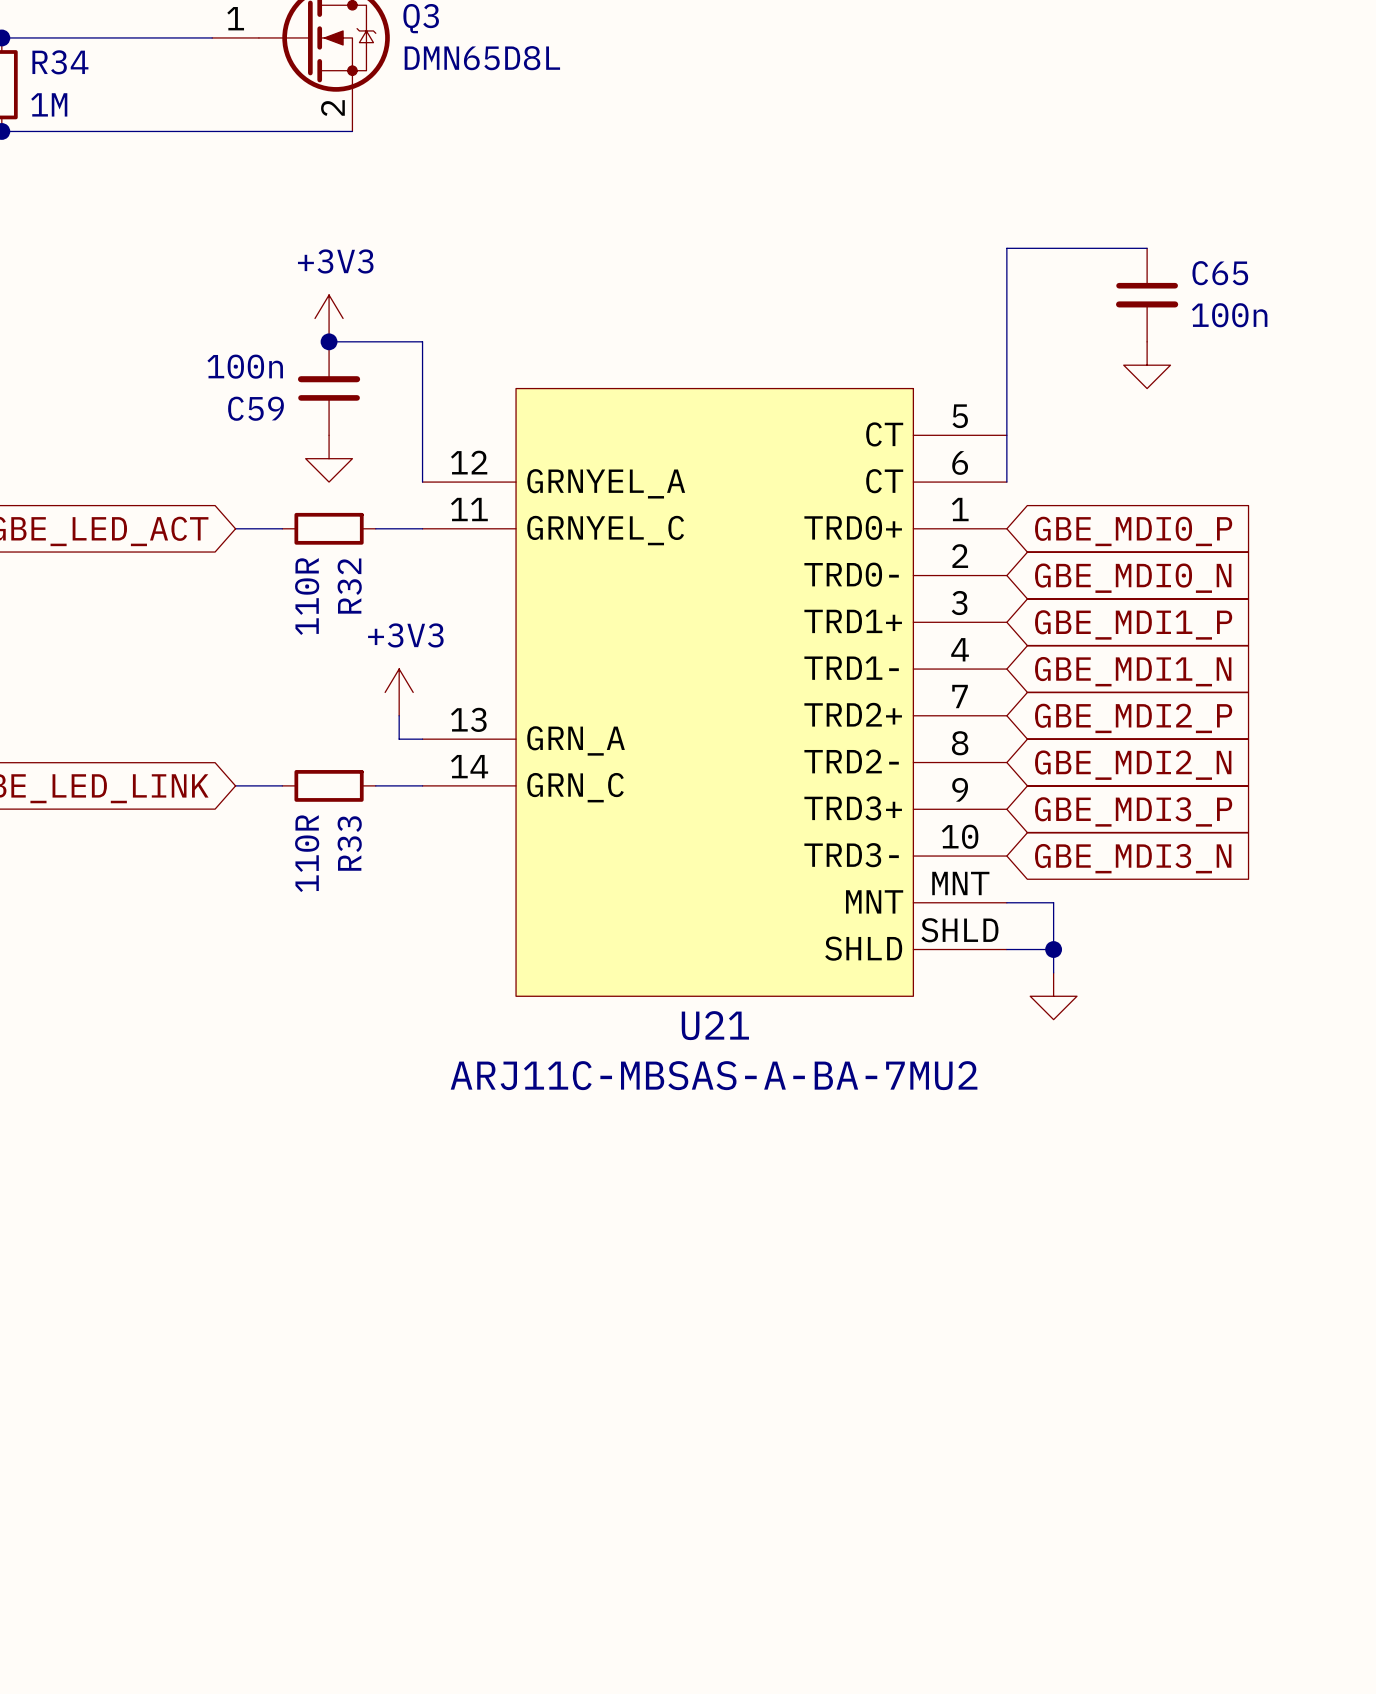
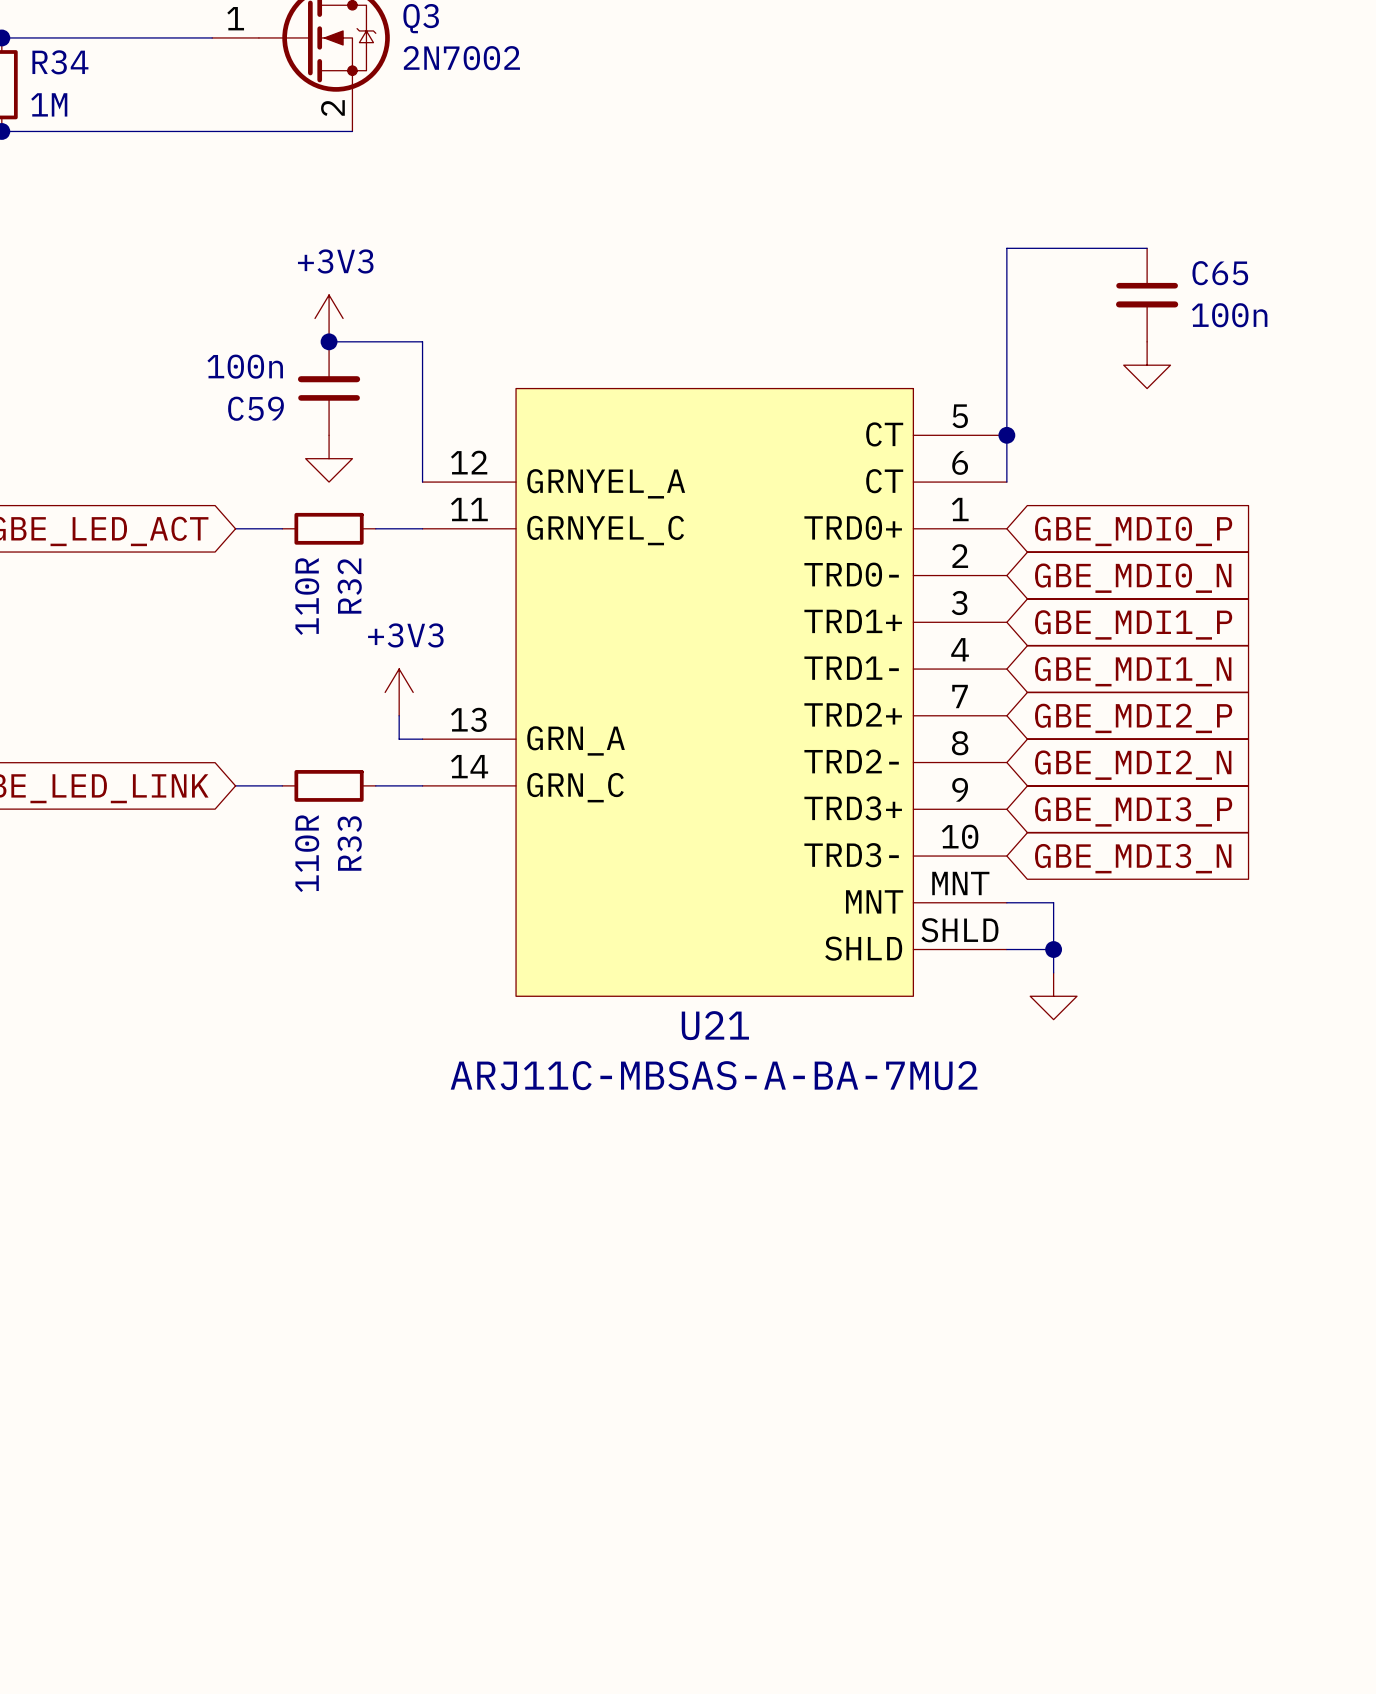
Q3 value: DMN65D8L (482, 58) -> 2N7002 (461, 58)
junction: none -> (1006, 435)

